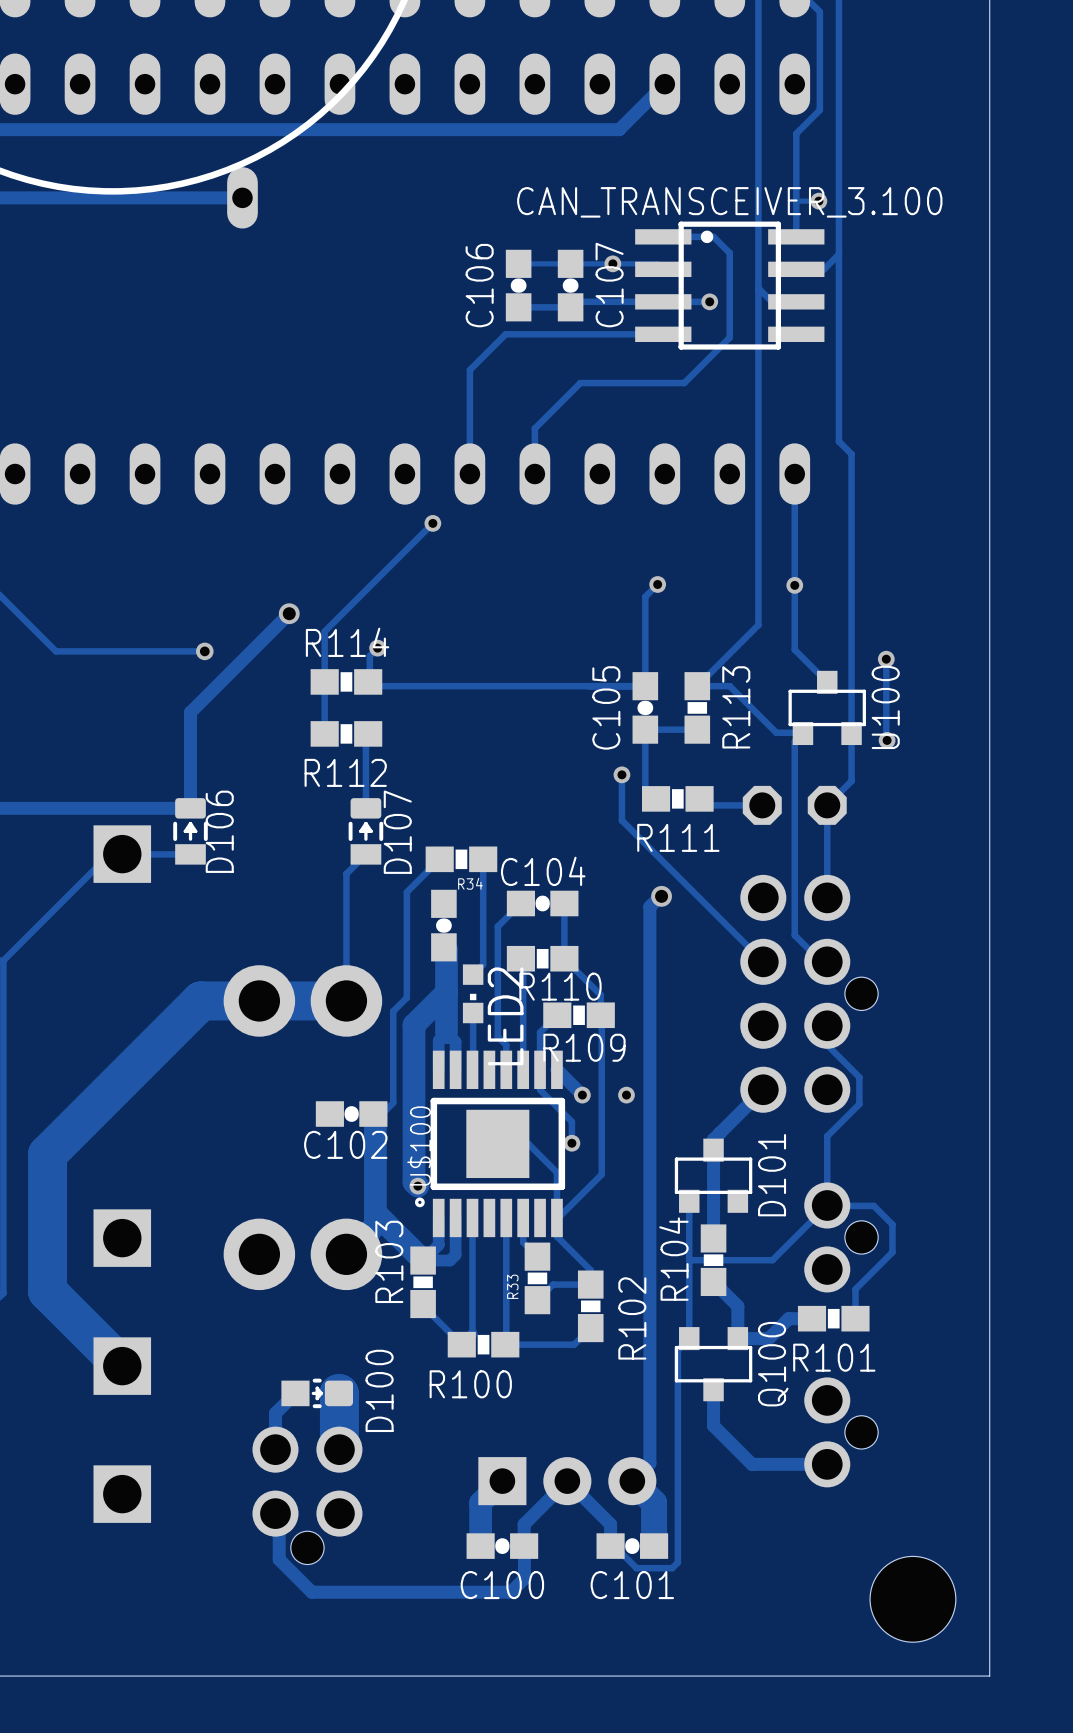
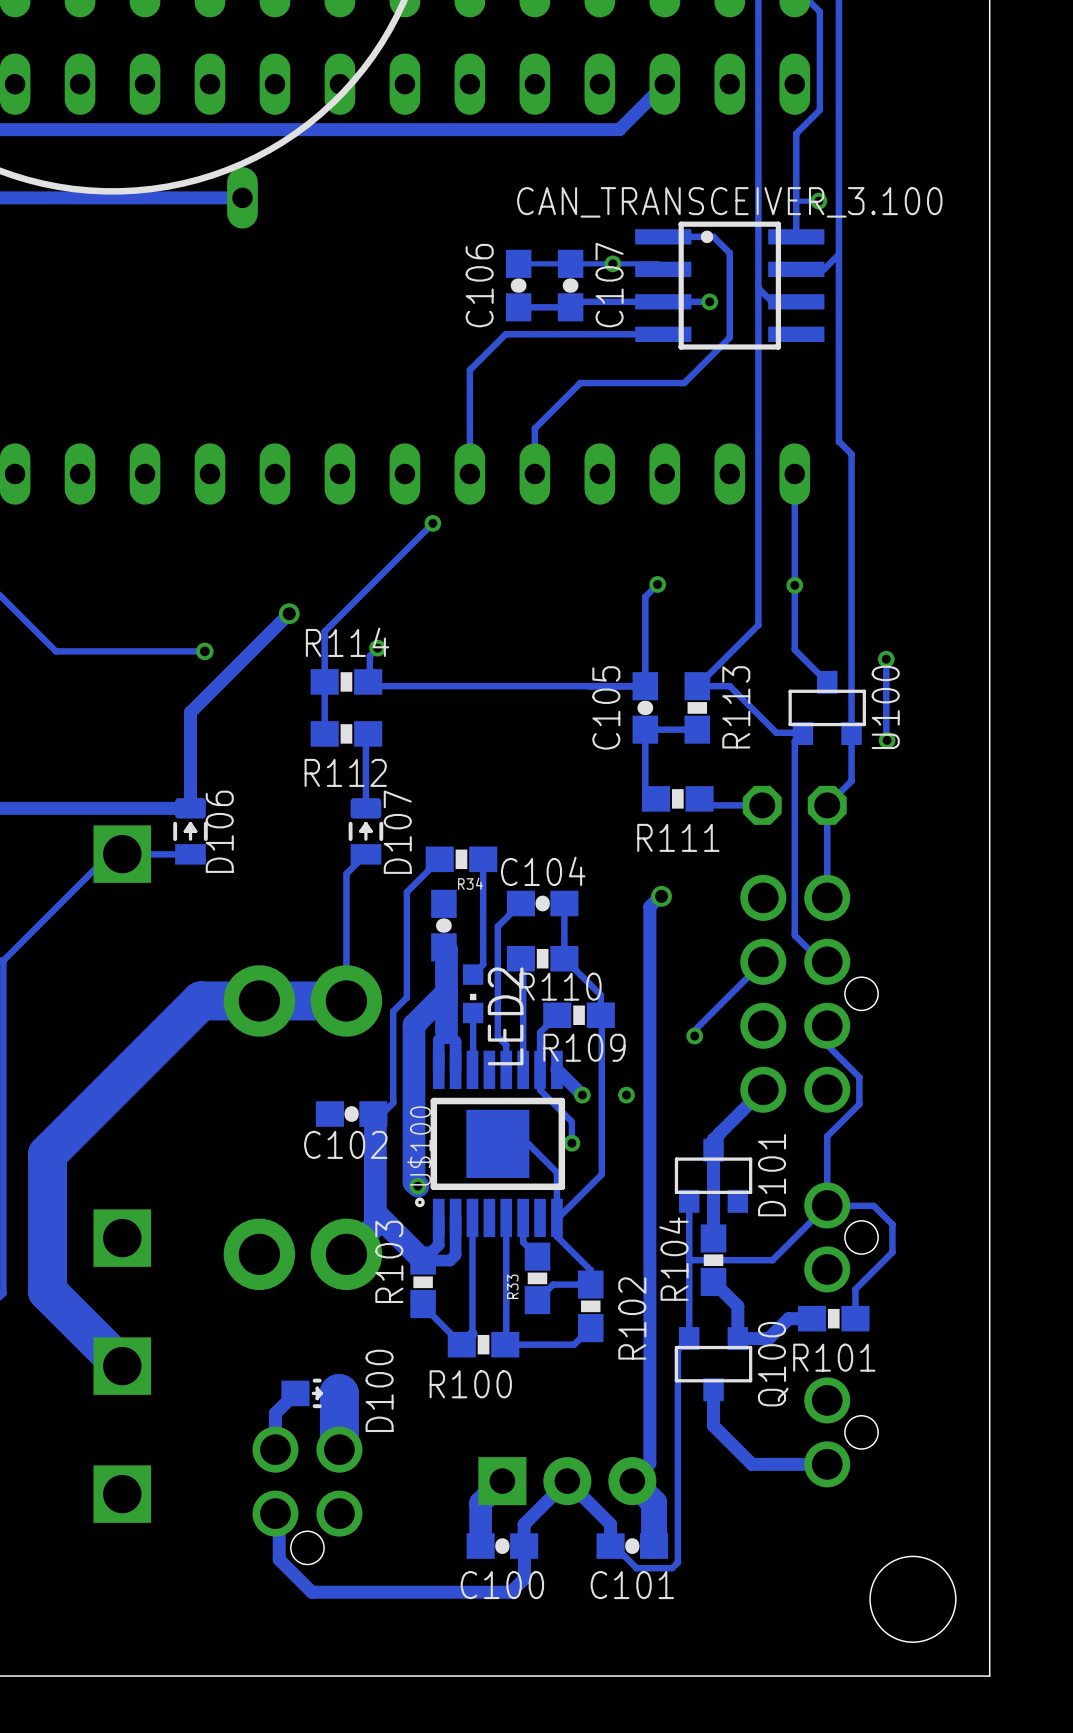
track: (621, 774) (621, 820) (763, 961) -> (694, 1036) (694, 1030) (763, 961)
via: (621, 774) -> none
via: none -> (694, 1036)

